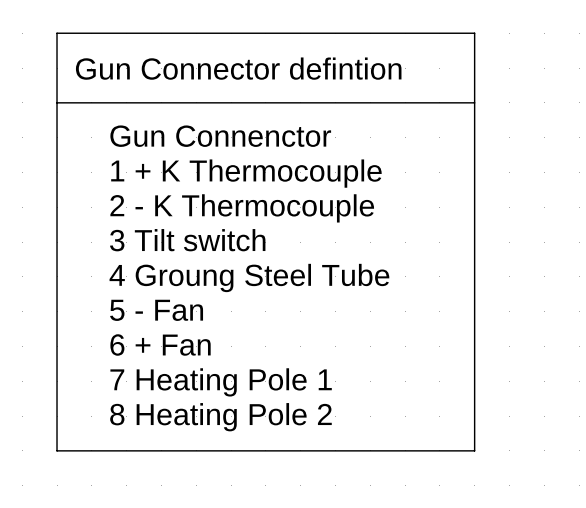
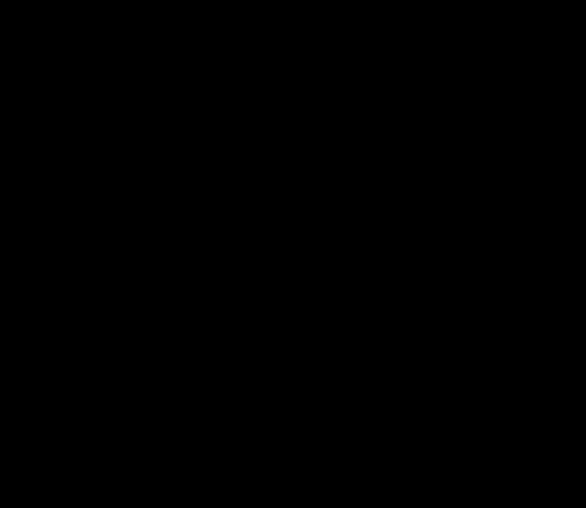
bus: (57, 33) (57, 450) (474, 450) (474, 33) (57, 33) -> none
text: Gun Connector defintion (238, 68) -> none
bus: (57, 102) (474, 102) -> none
text: Gun Connenctor (220, 136) -> none
text: 1 + K Thermocouple (246, 173) -> none
text: 2 - K Thermocouple (242, 208) -> none
text: 3 Tilt switch (187, 240) -> none
text: 4 Groung Steel Tube (249, 277) -> none
text: 5 - Fan (156, 310) -> none
text: 6 + Fan (160, 344) -> none
text: 7 Heating Pole 1 (221, 382) -> none
text: 8 Heating Pole 2 (220, 417) -> none

